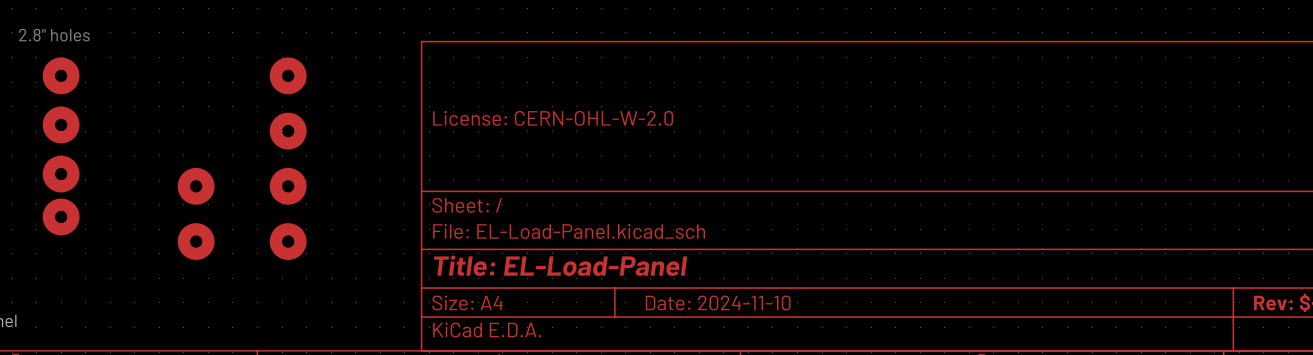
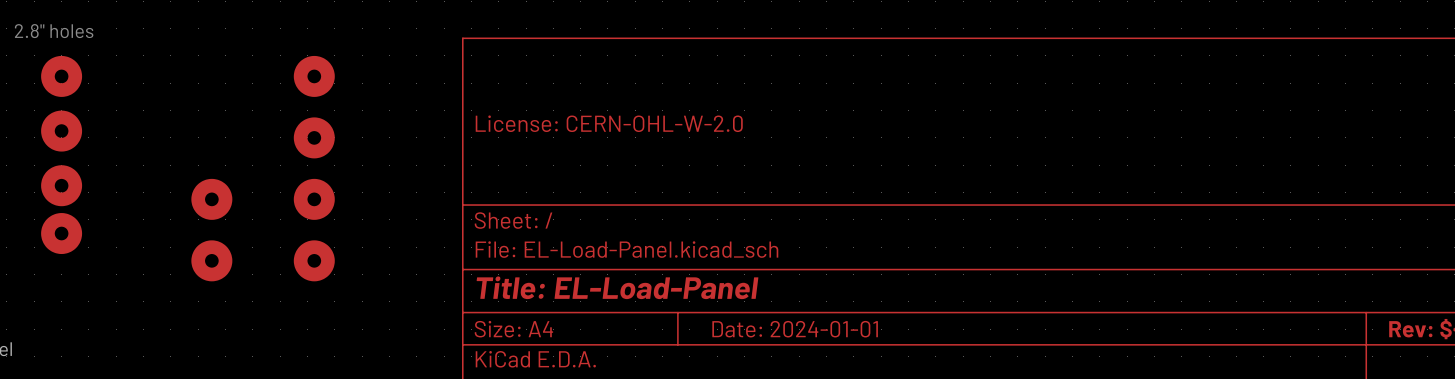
title block: Date: 2024-11-10 (718, 302) -> Date: 2024-01-01 (795, 329)

